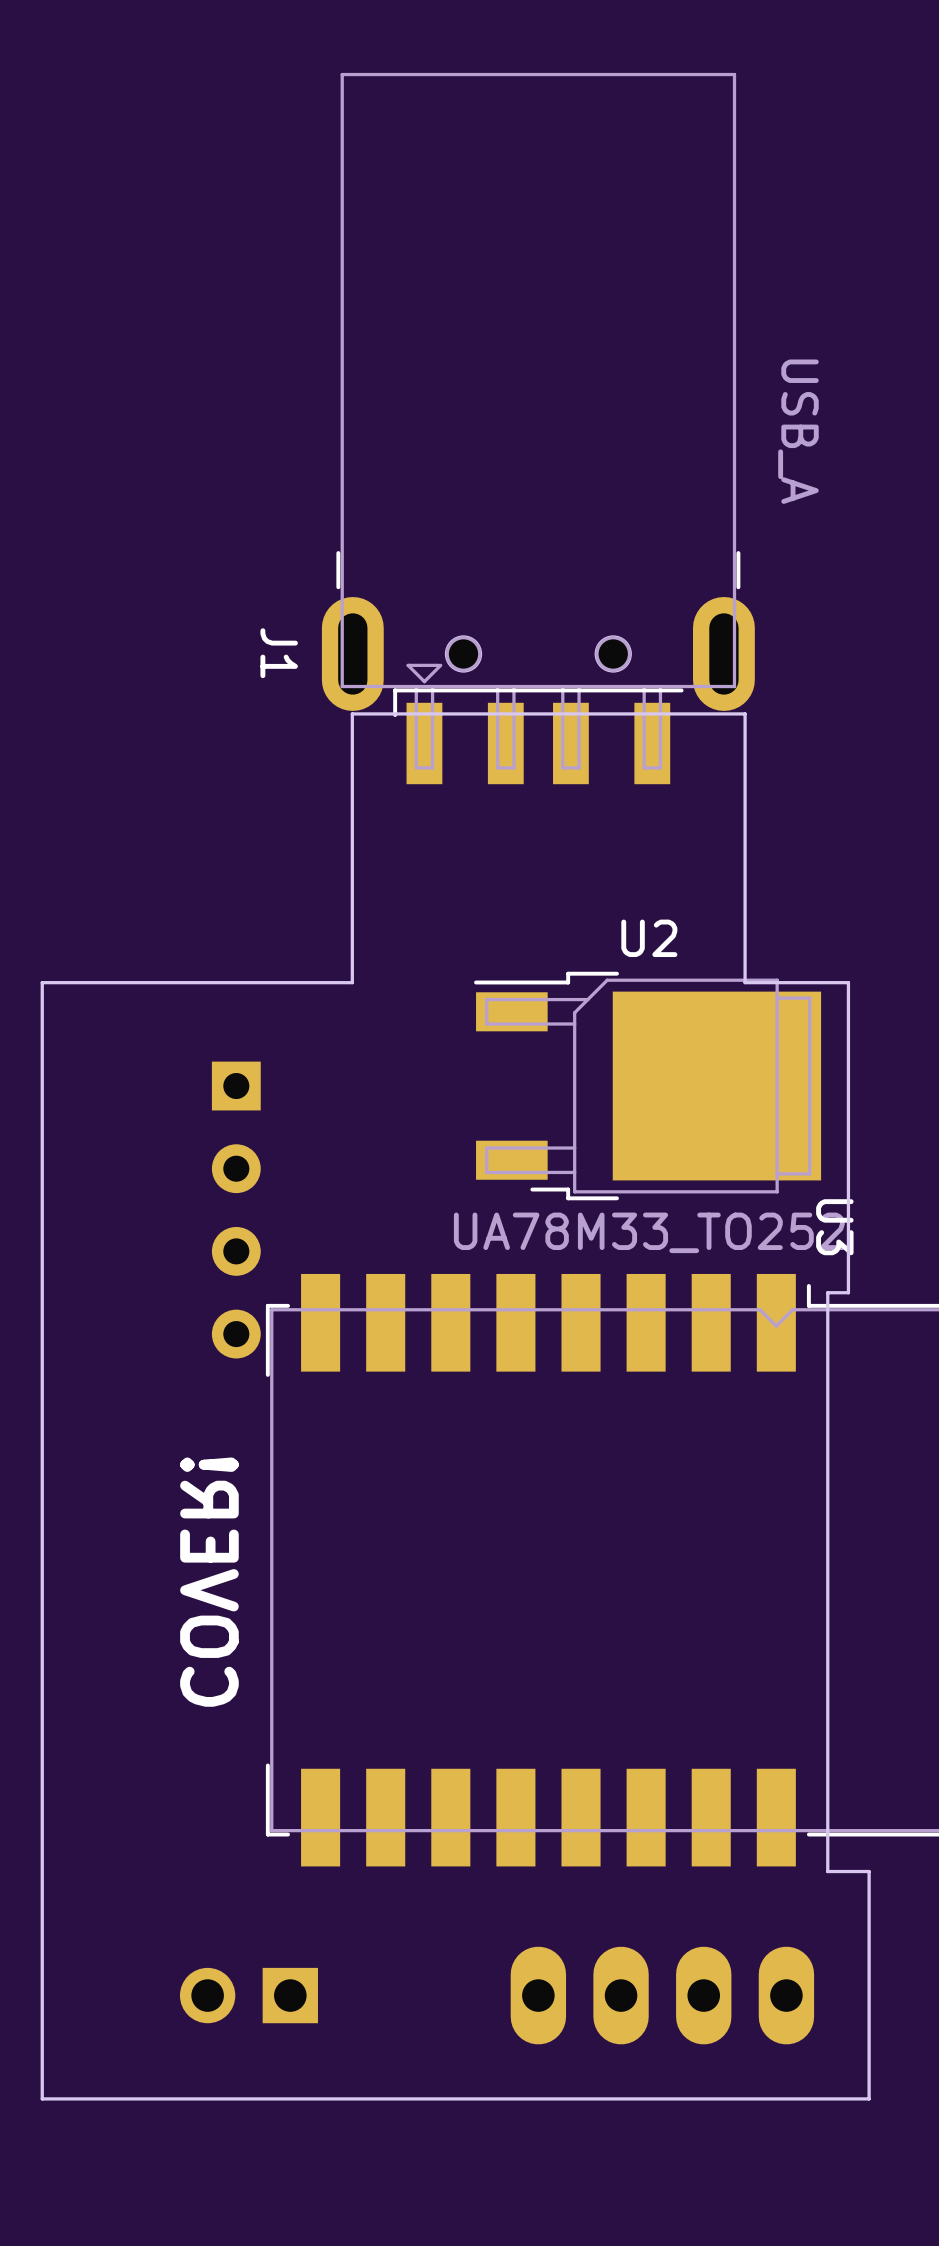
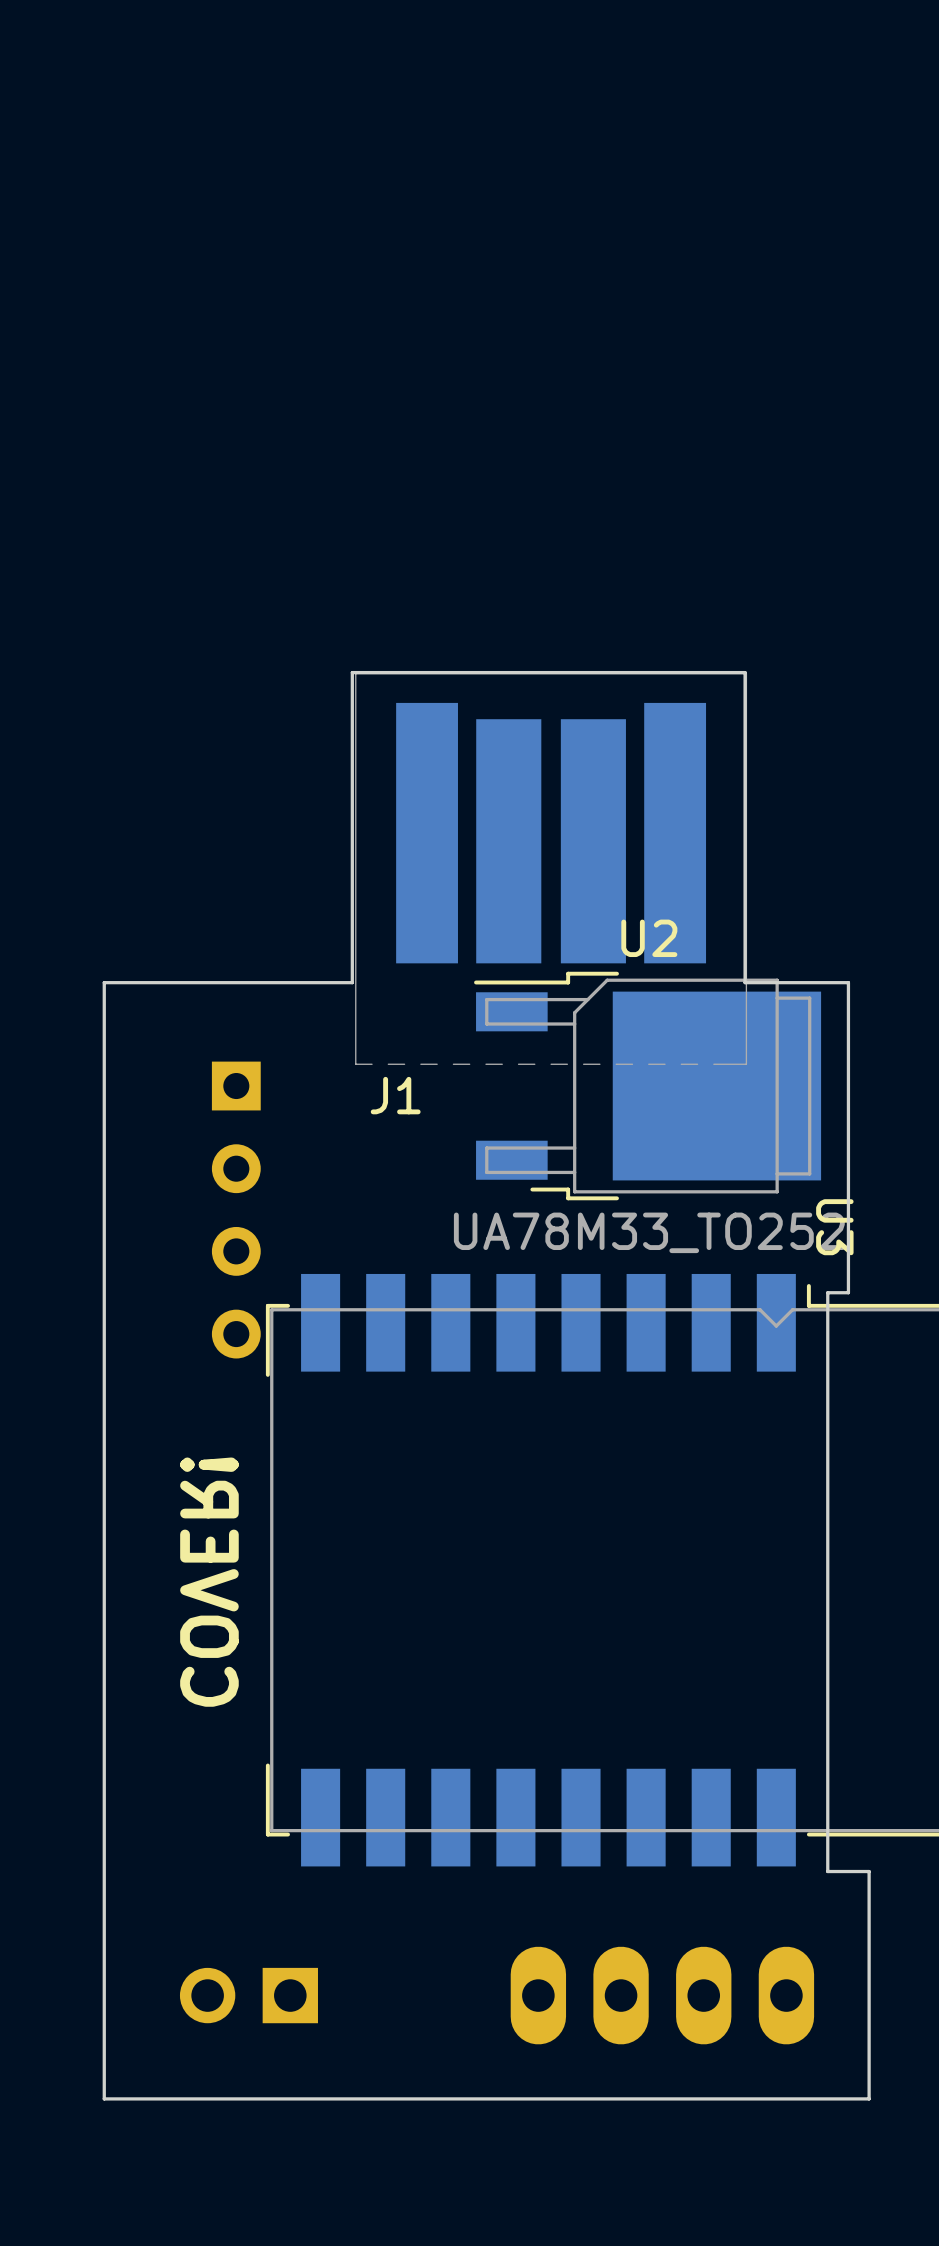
J1 footprint: [321, 72, 755, 785] -> [355, 672, 748, 1065]
J1 value: USB_A (798, 431) -> none
J1 name position: J1 (279, 653) -> J1 (395, 1095)
board edge: (745, 713) (352, 713) -> (745, 713) (745, 672) (352, 672) (352, 713)
board edge: (104, 982) (42, 982) (42, 2098) (104, 2098) -> (104, 982) (104, 2098)

